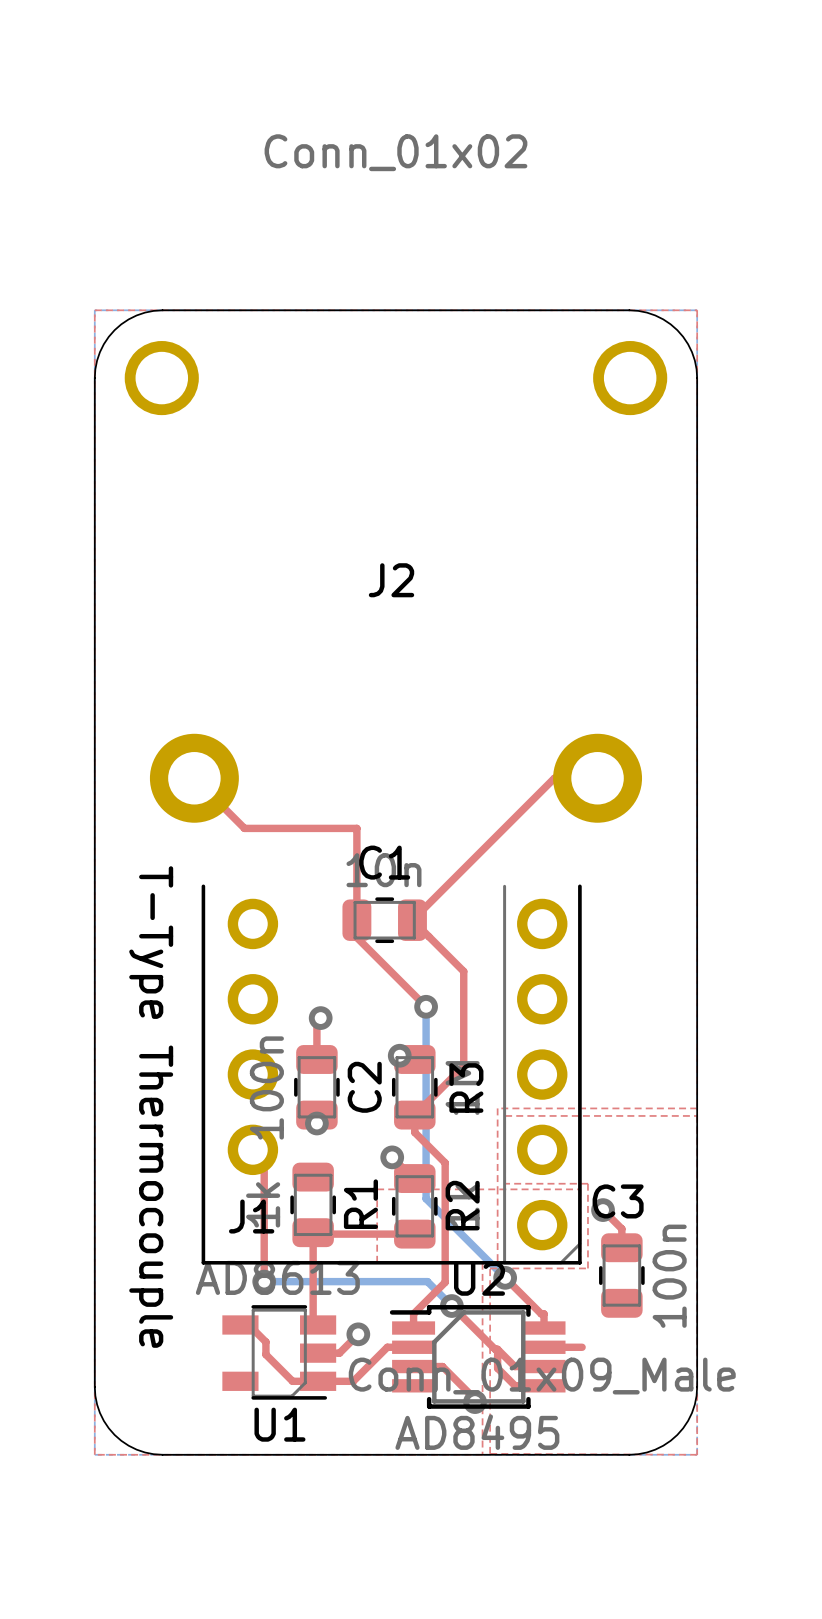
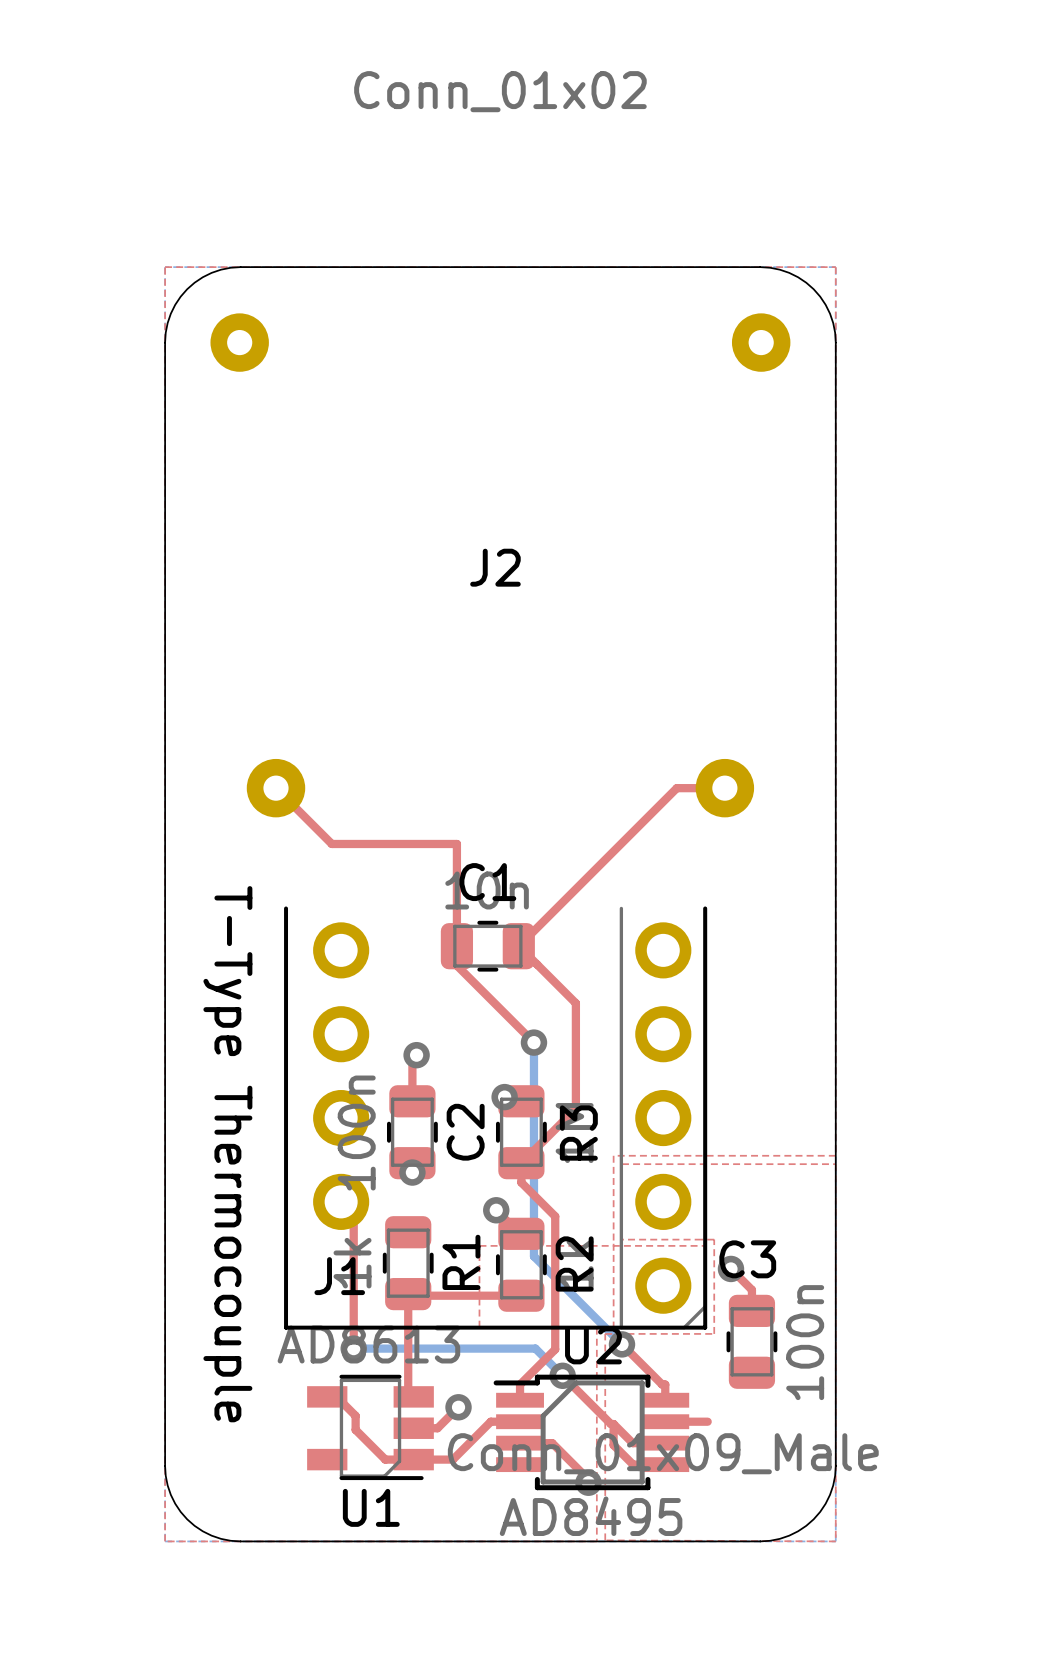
J2 footprint: [124, 341, 668, 823] -> [210, 313, 791, 818]

